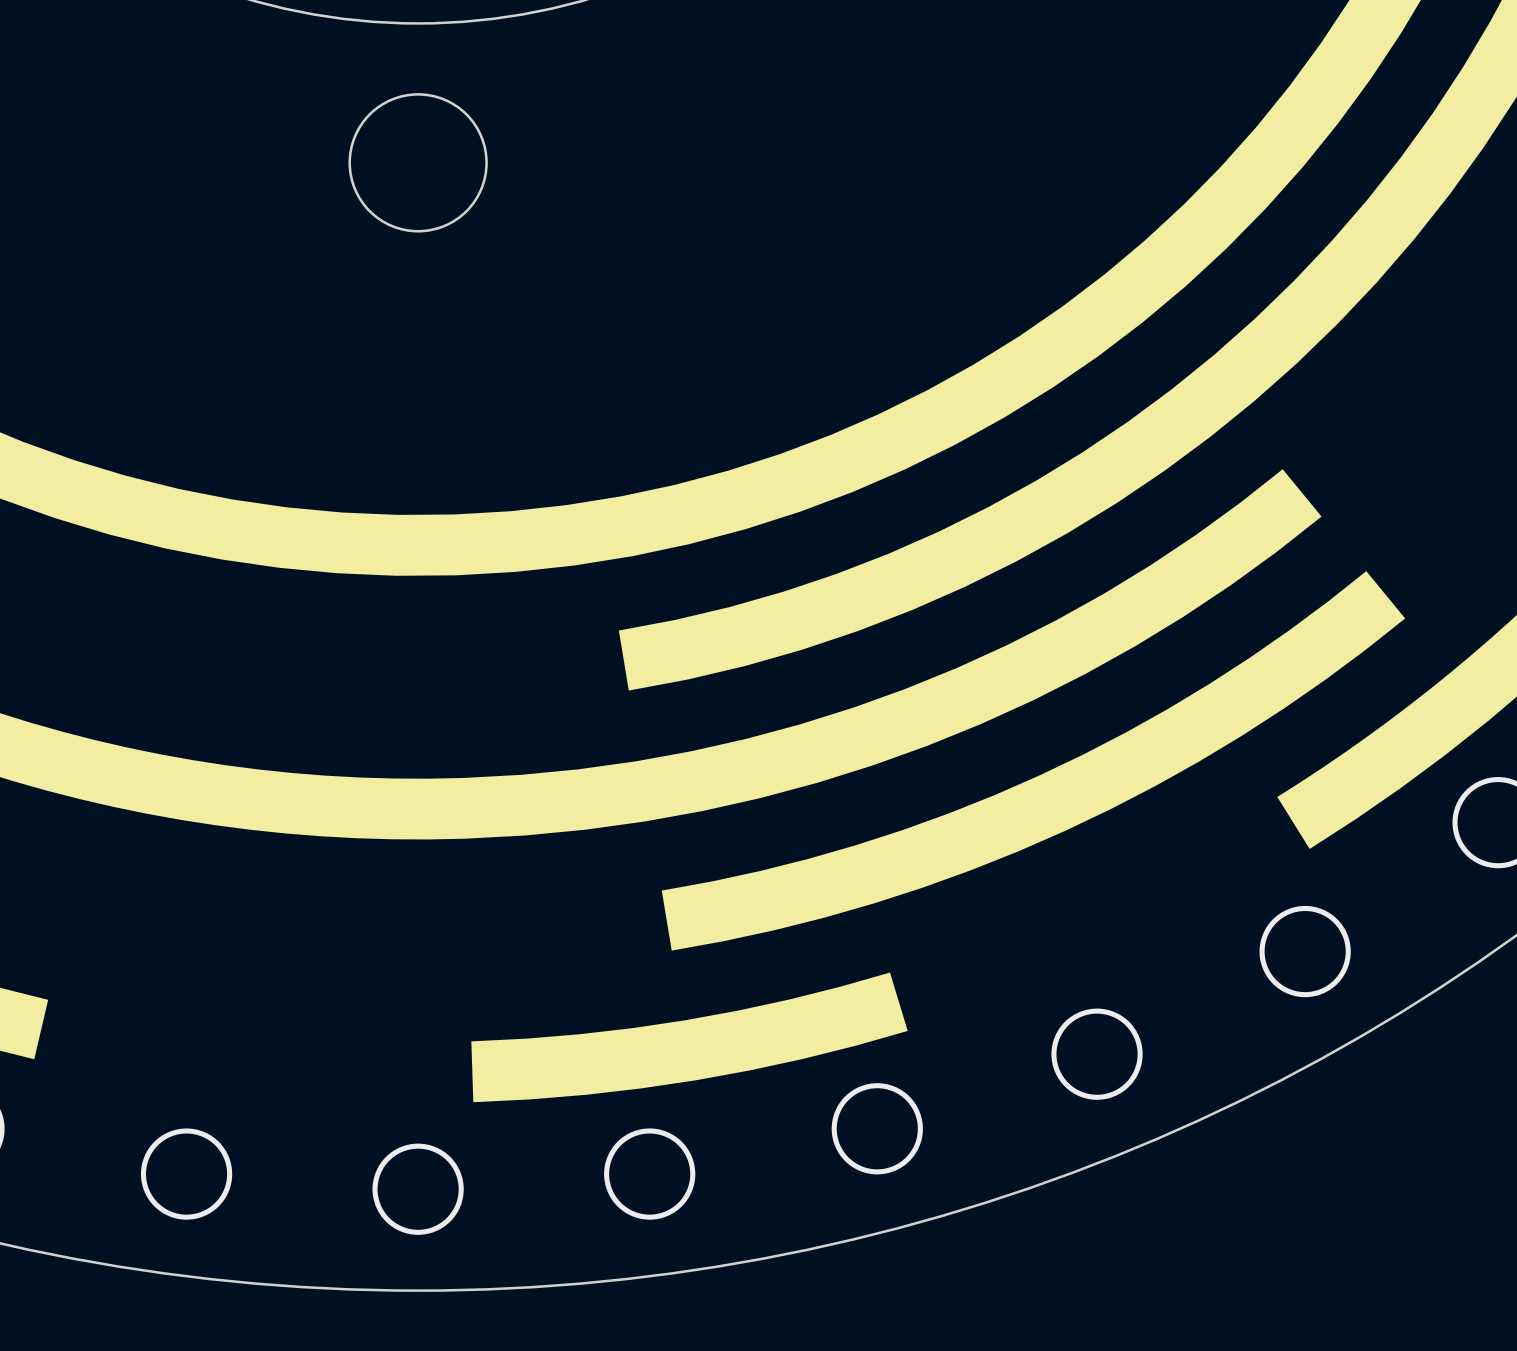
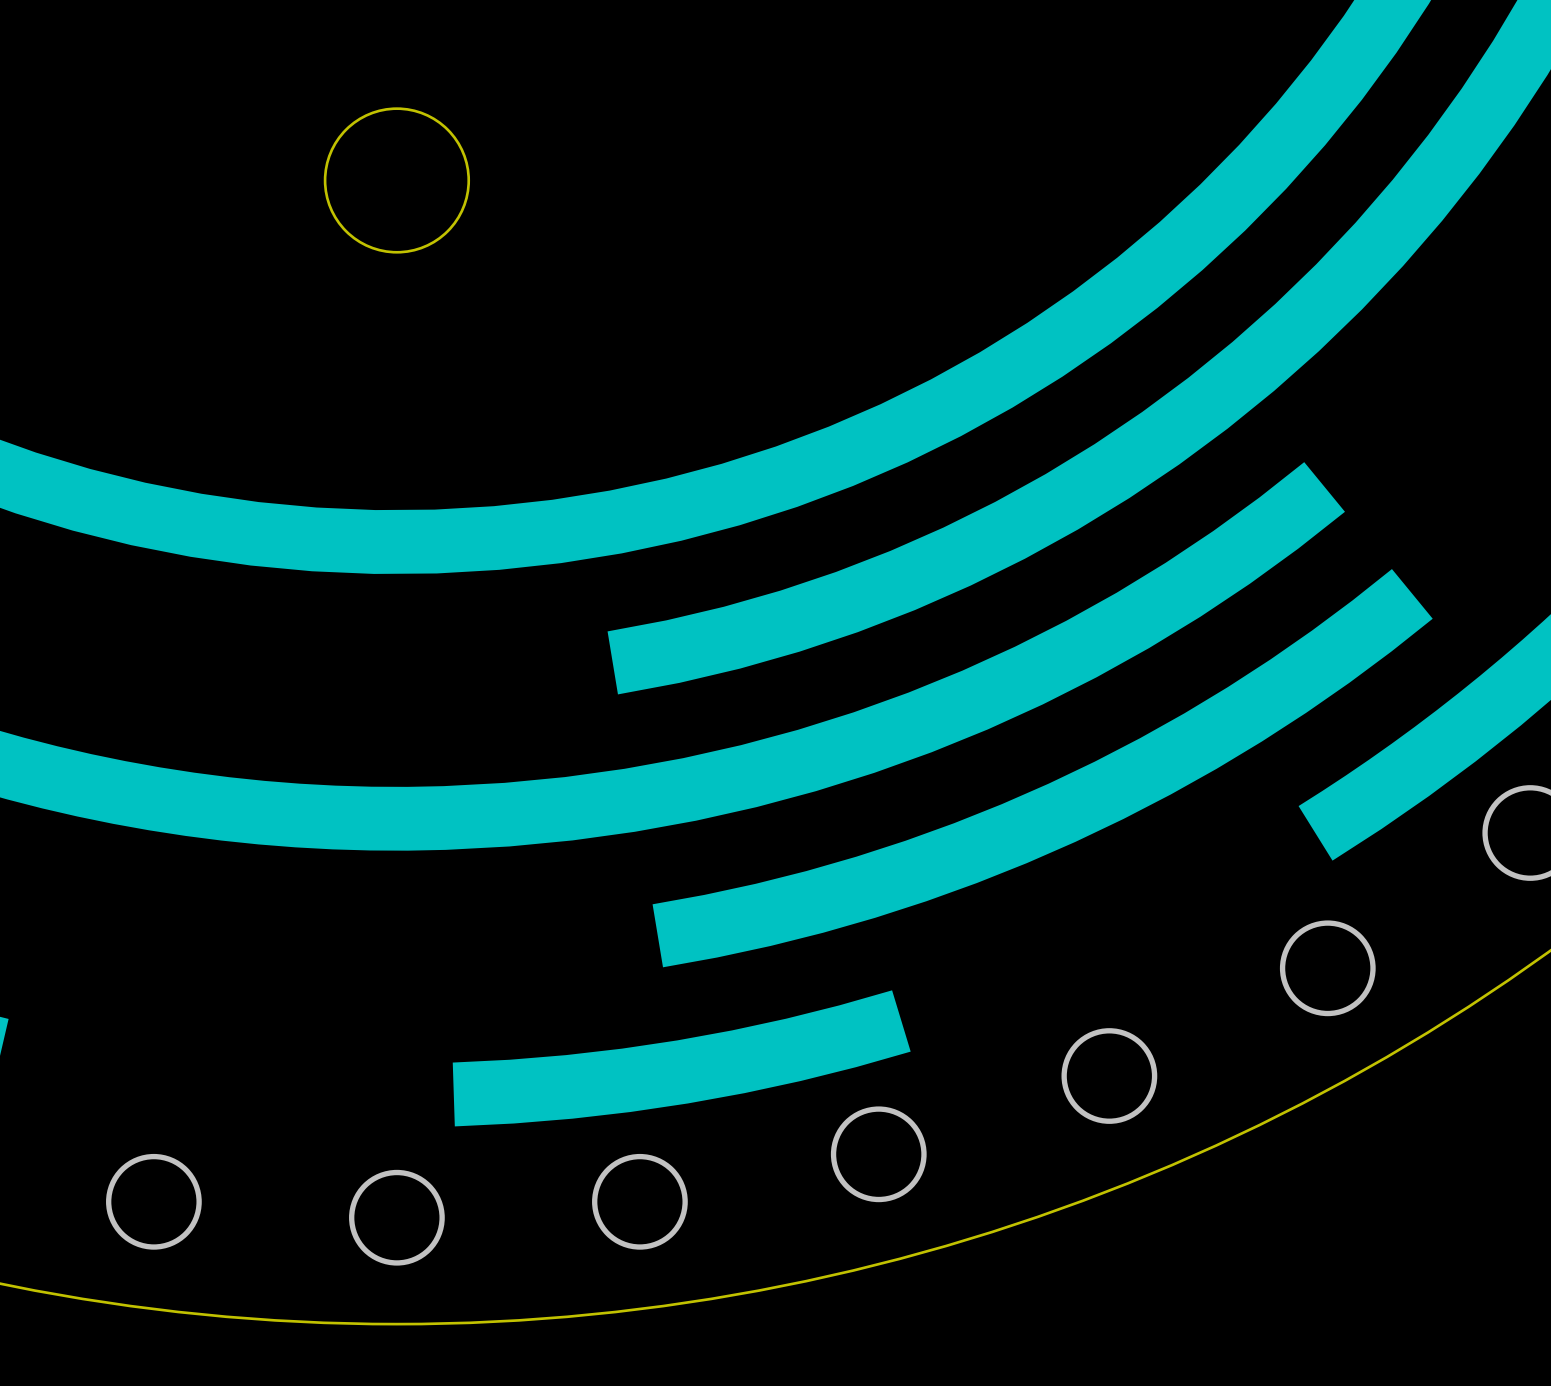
round board edge position: (418, 162) -> (396, 180)

